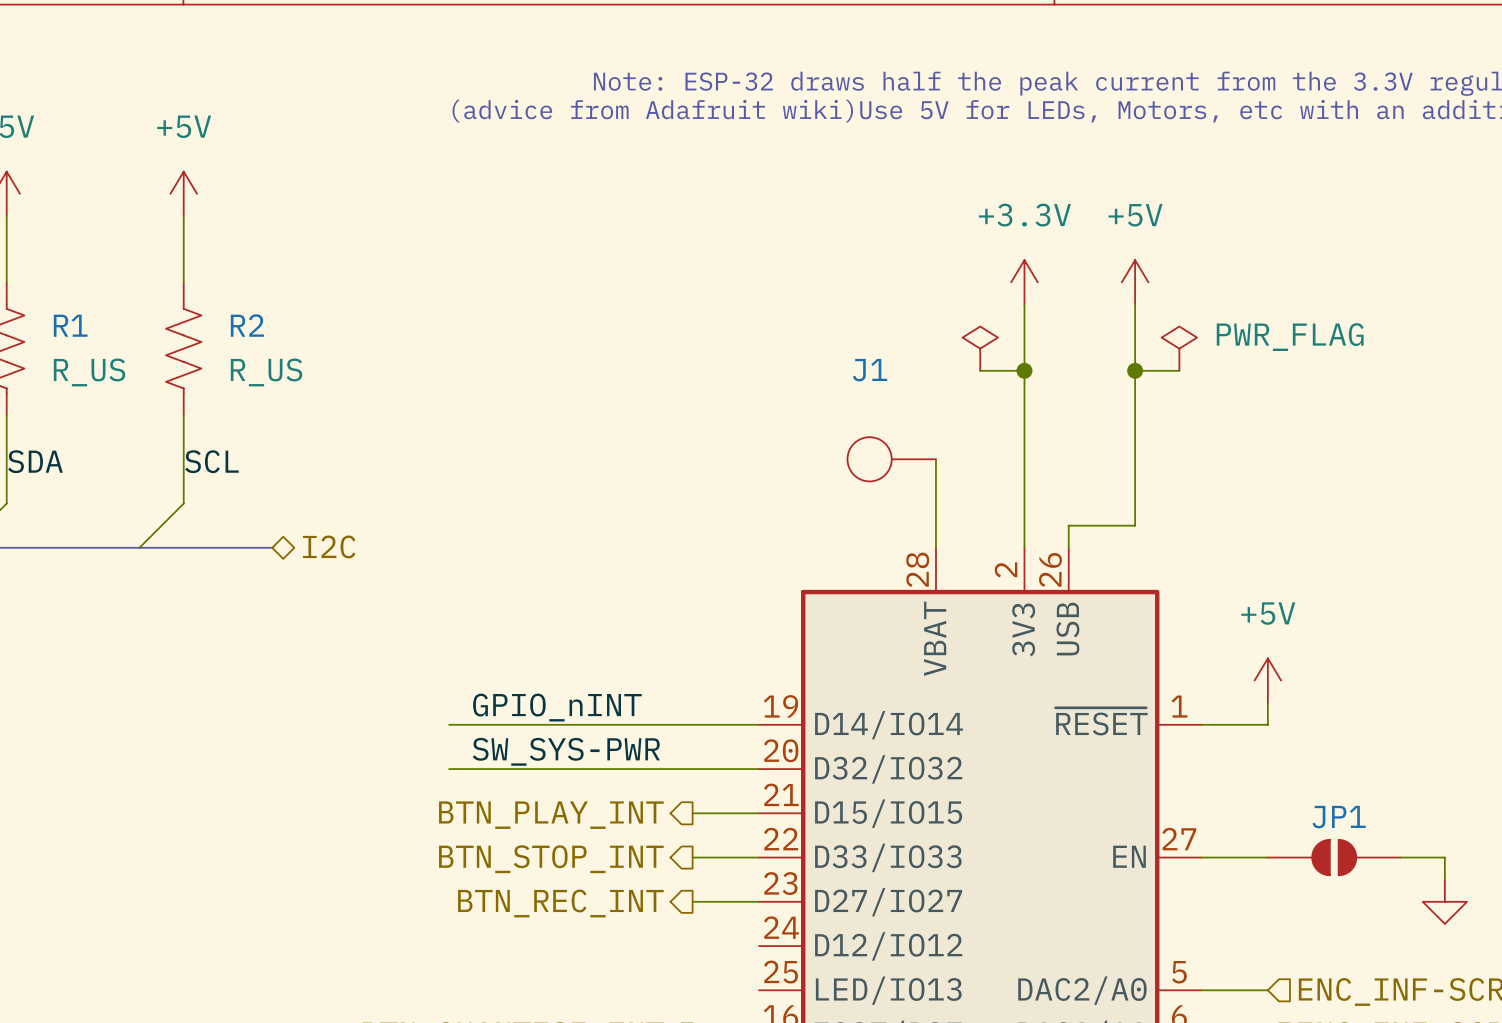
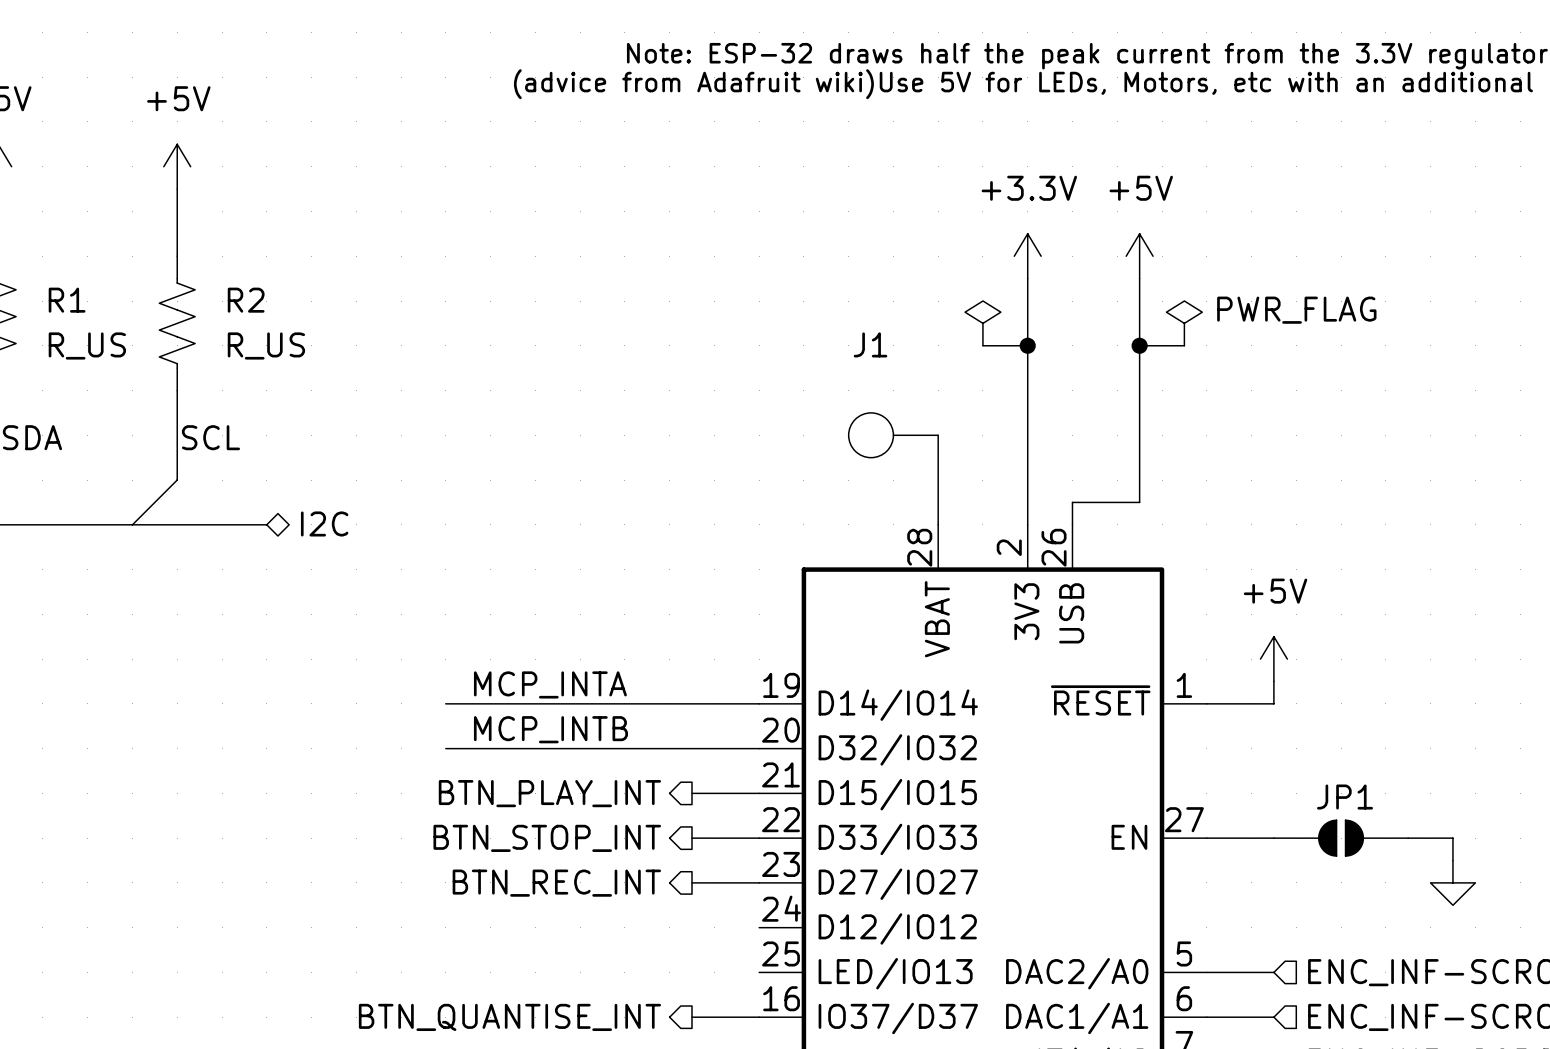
label: GPIO_nINT (557, 707) -> MCP_INTA (550, 684)
label: SW_SYS-PWR (566, 751) -> MCP_INTB (550, 729)

